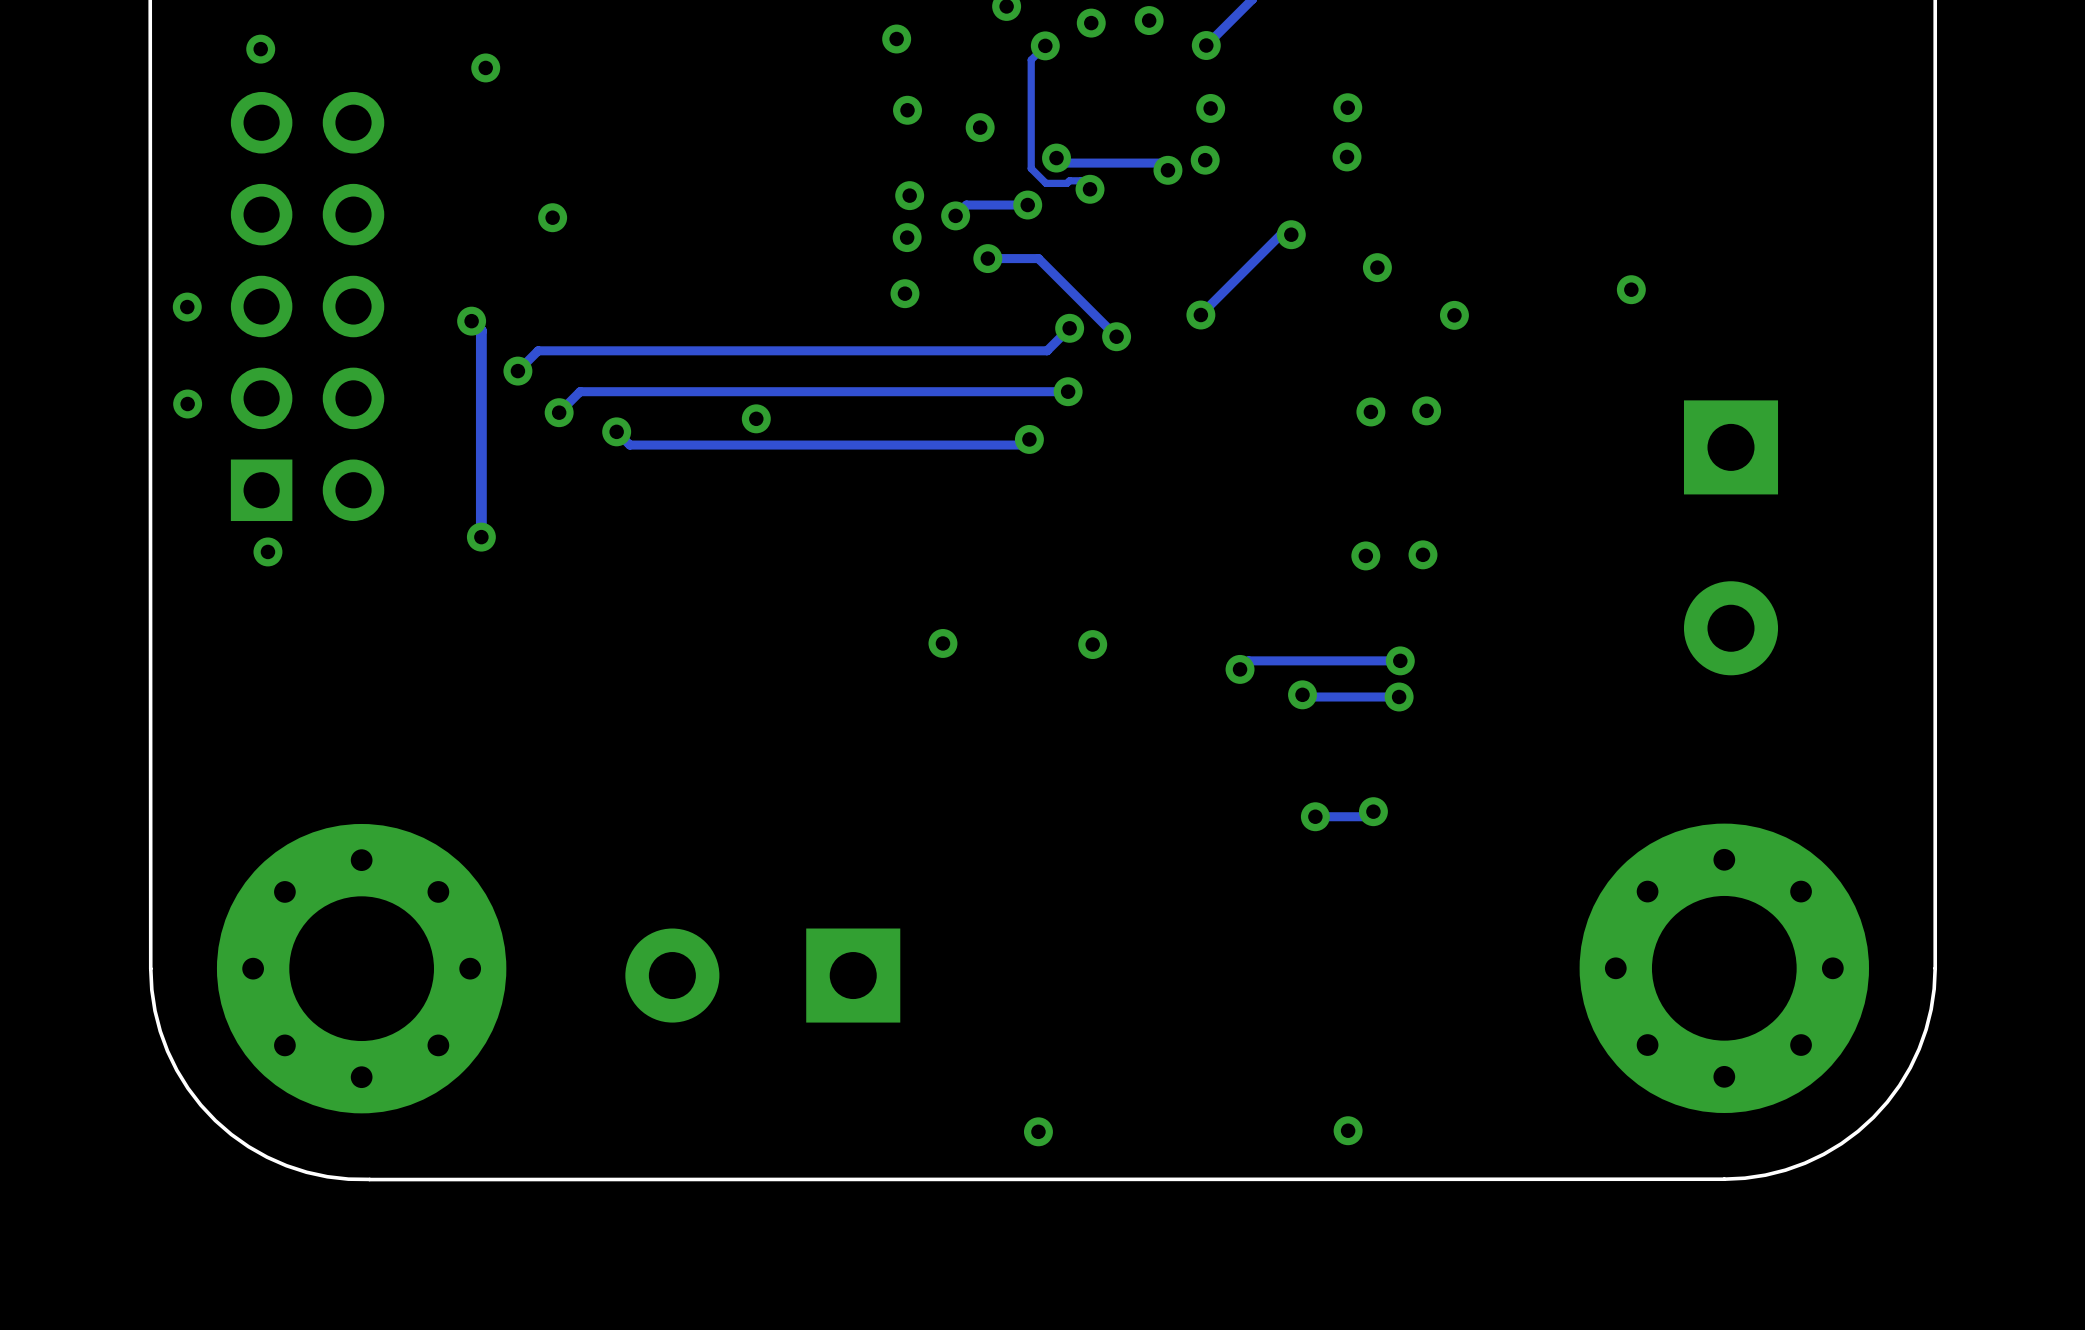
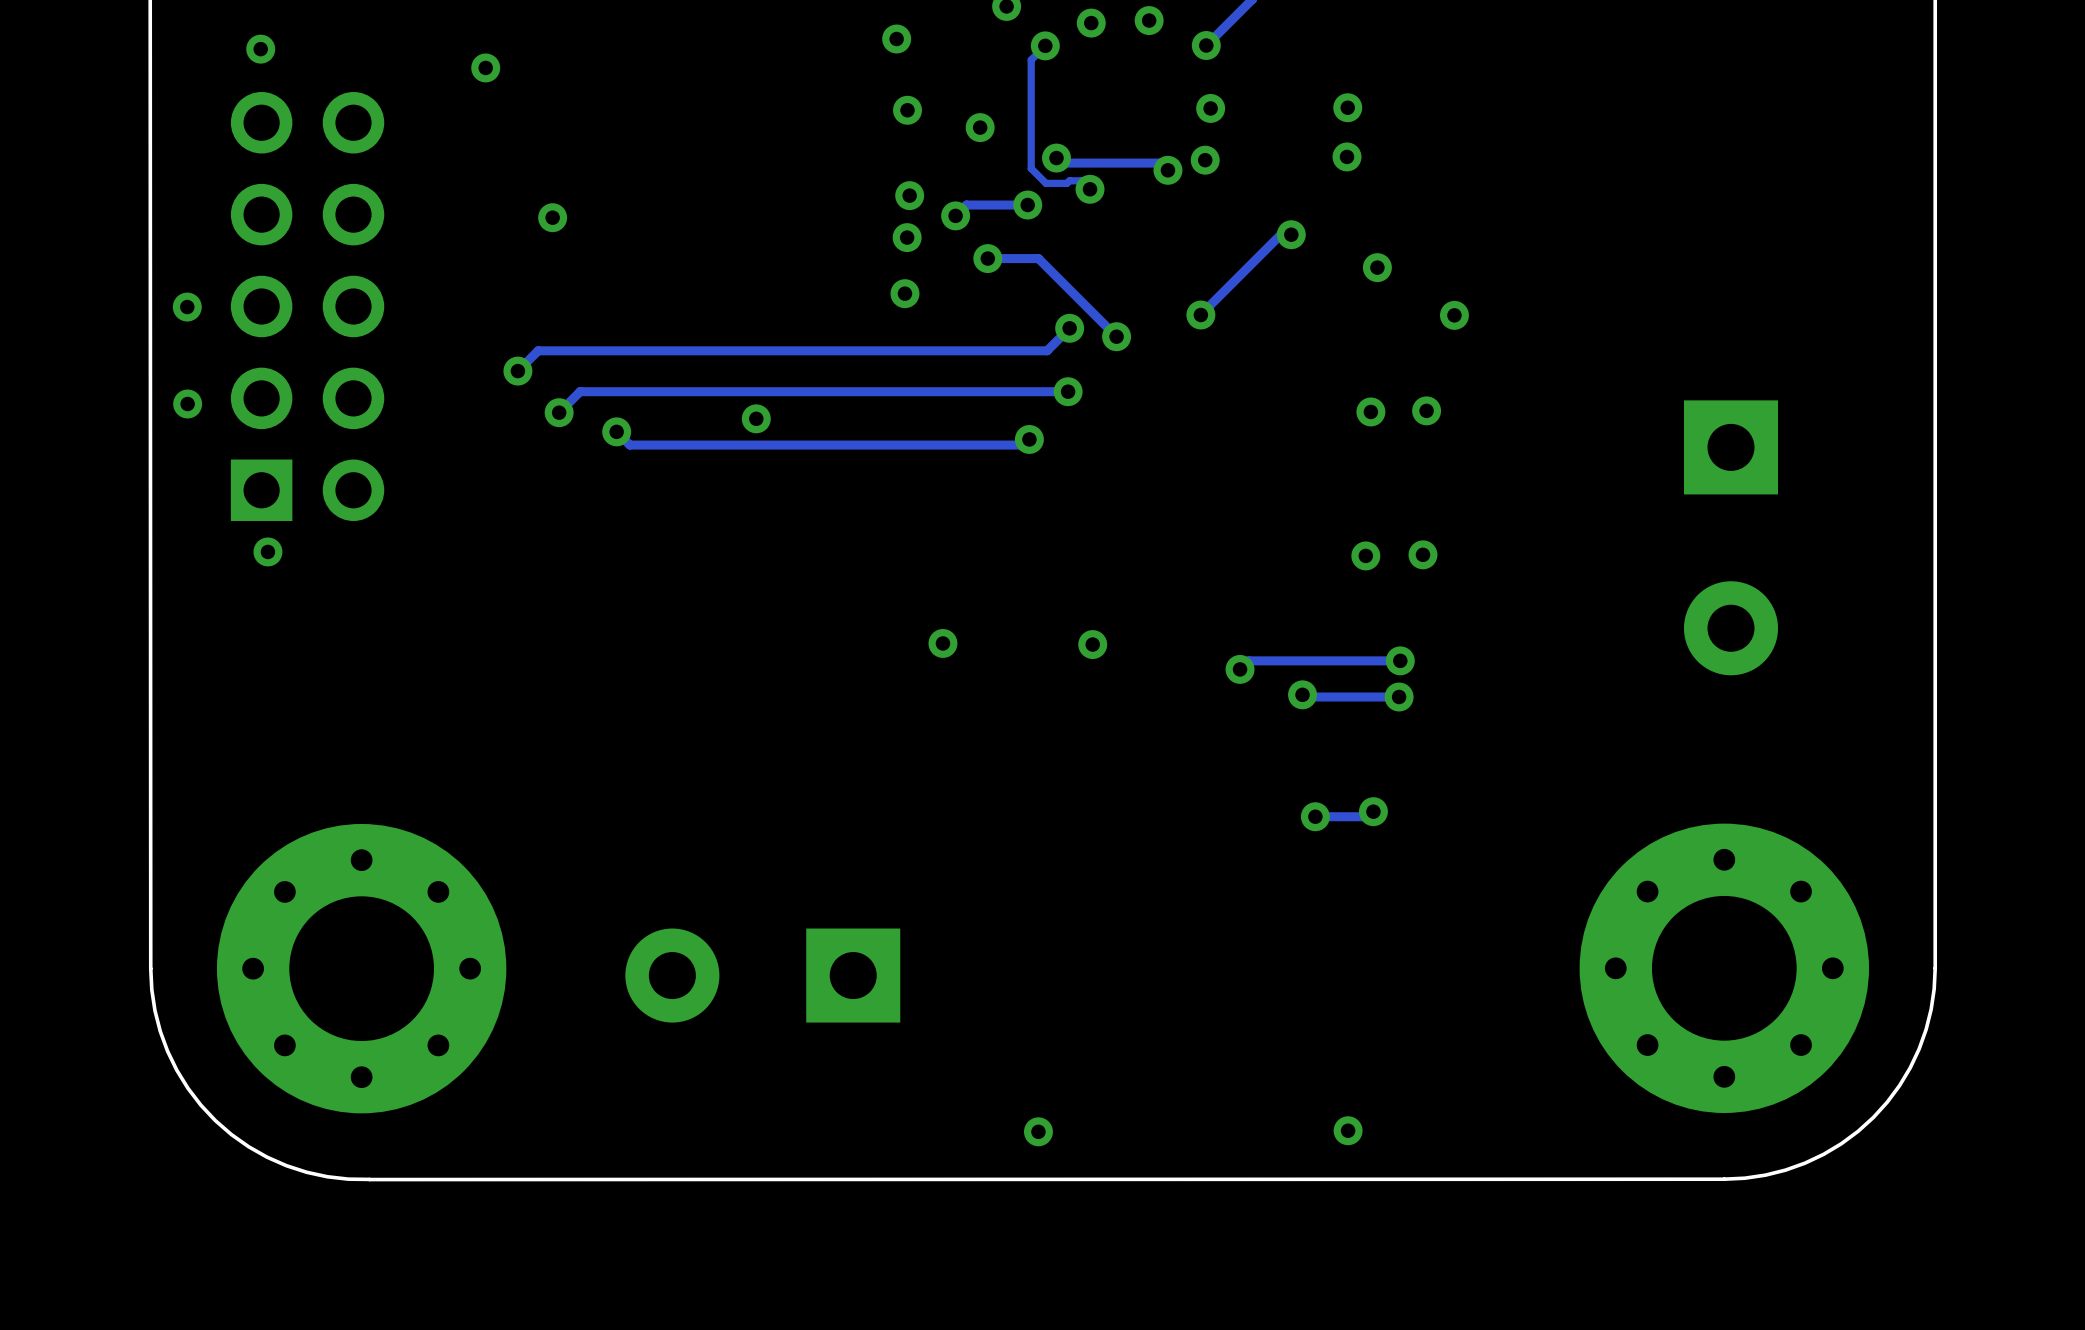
via: (1631, 289) -> none
track: (471, 321) (481, 330) (481, 537) -> none
via: (471, 321) -> none
via: (481, 537) -> none

